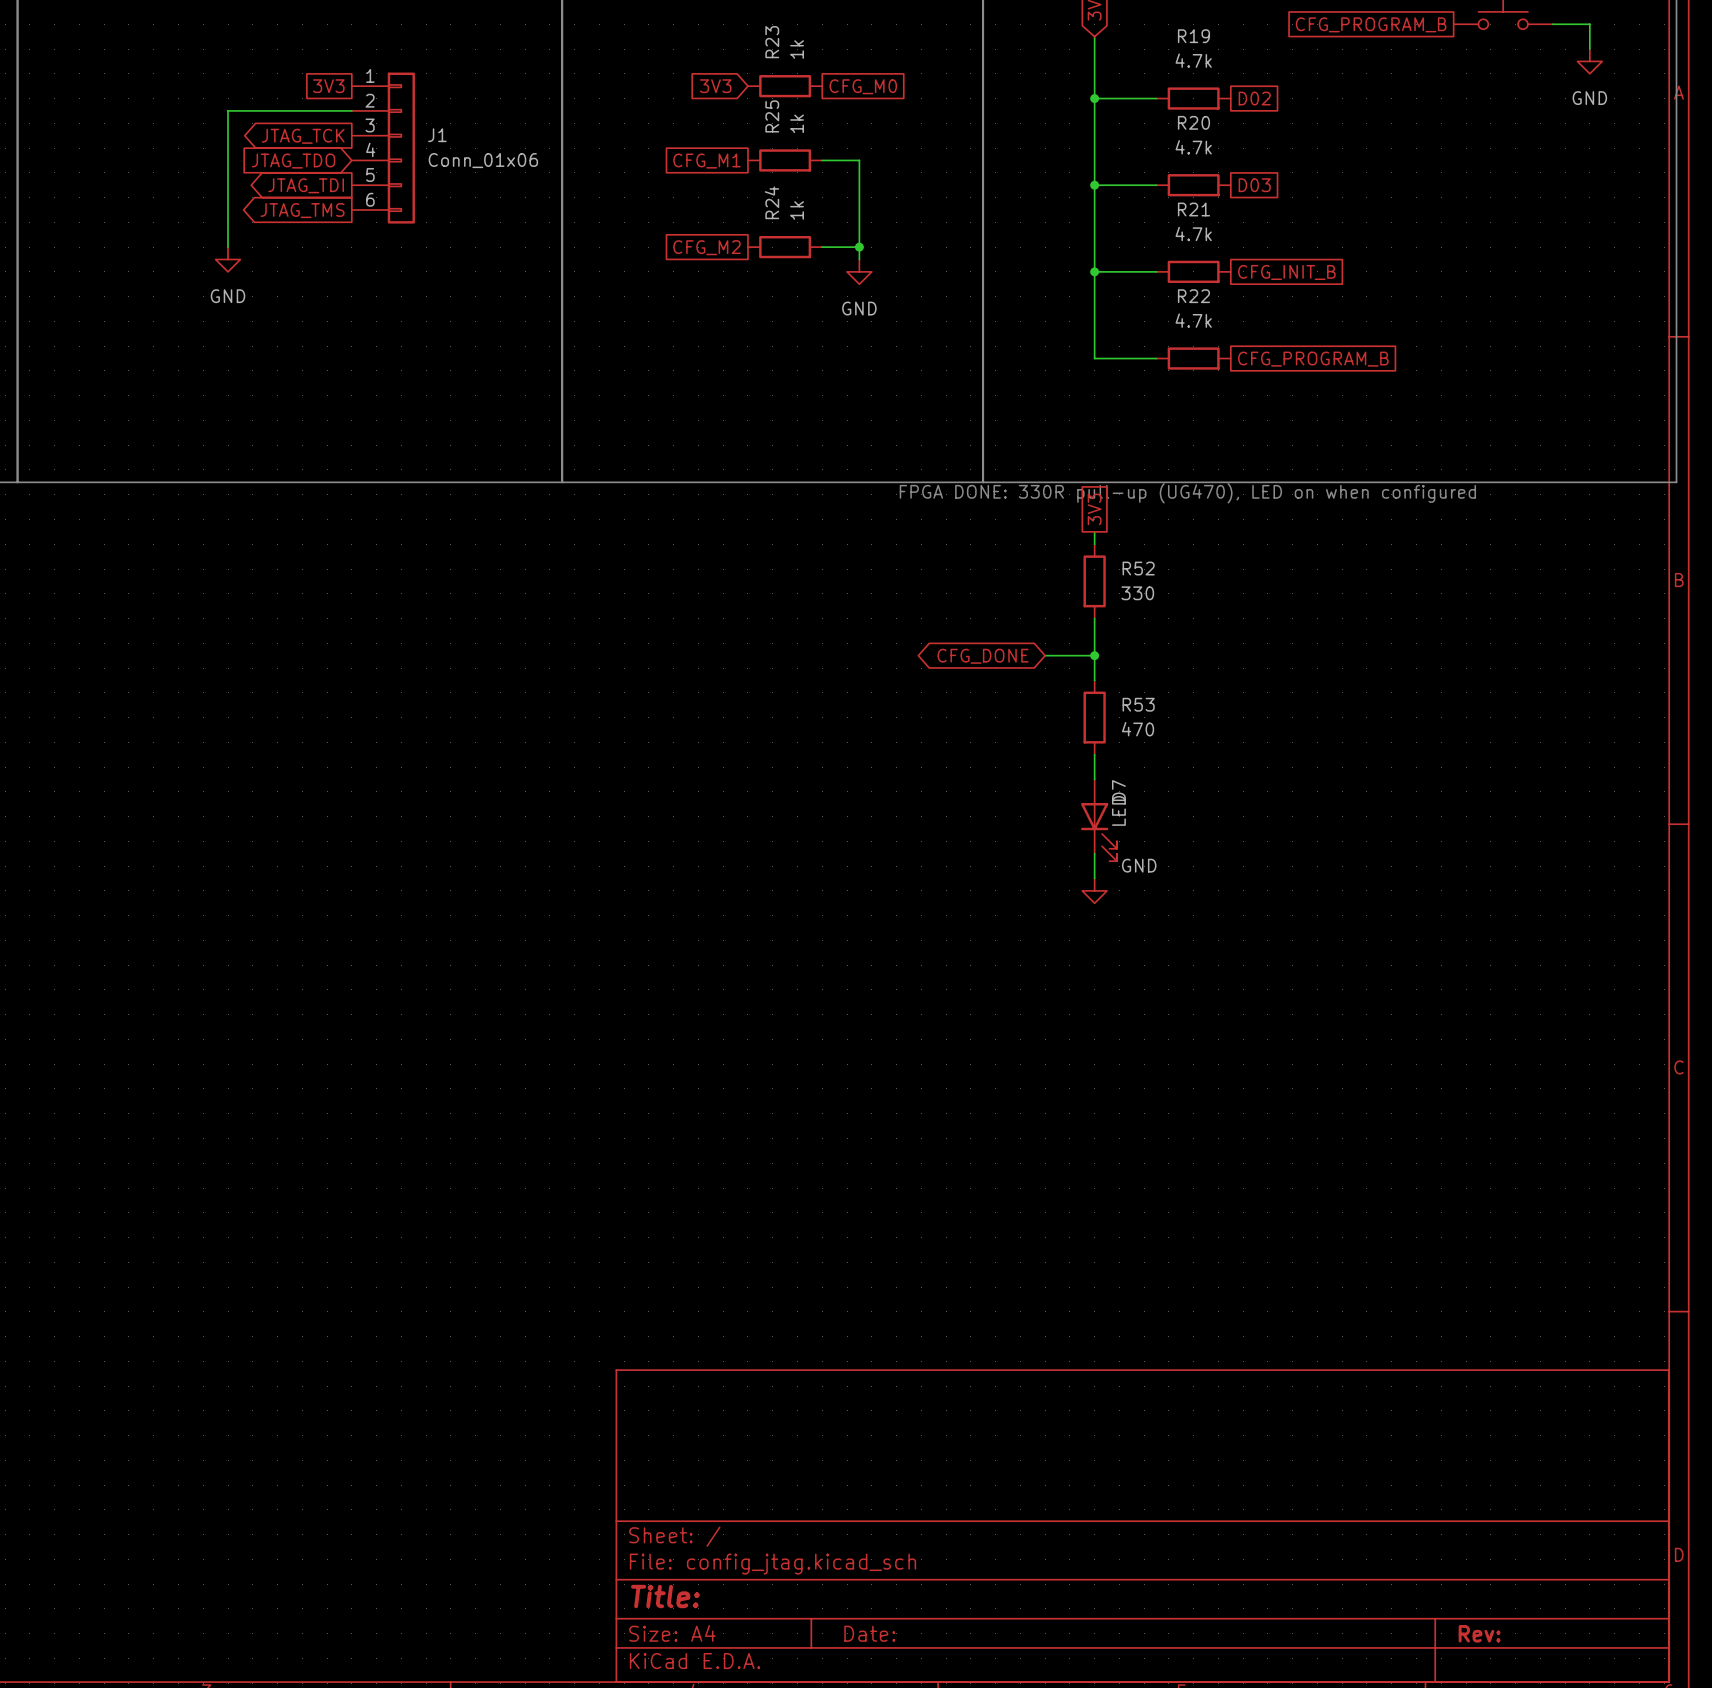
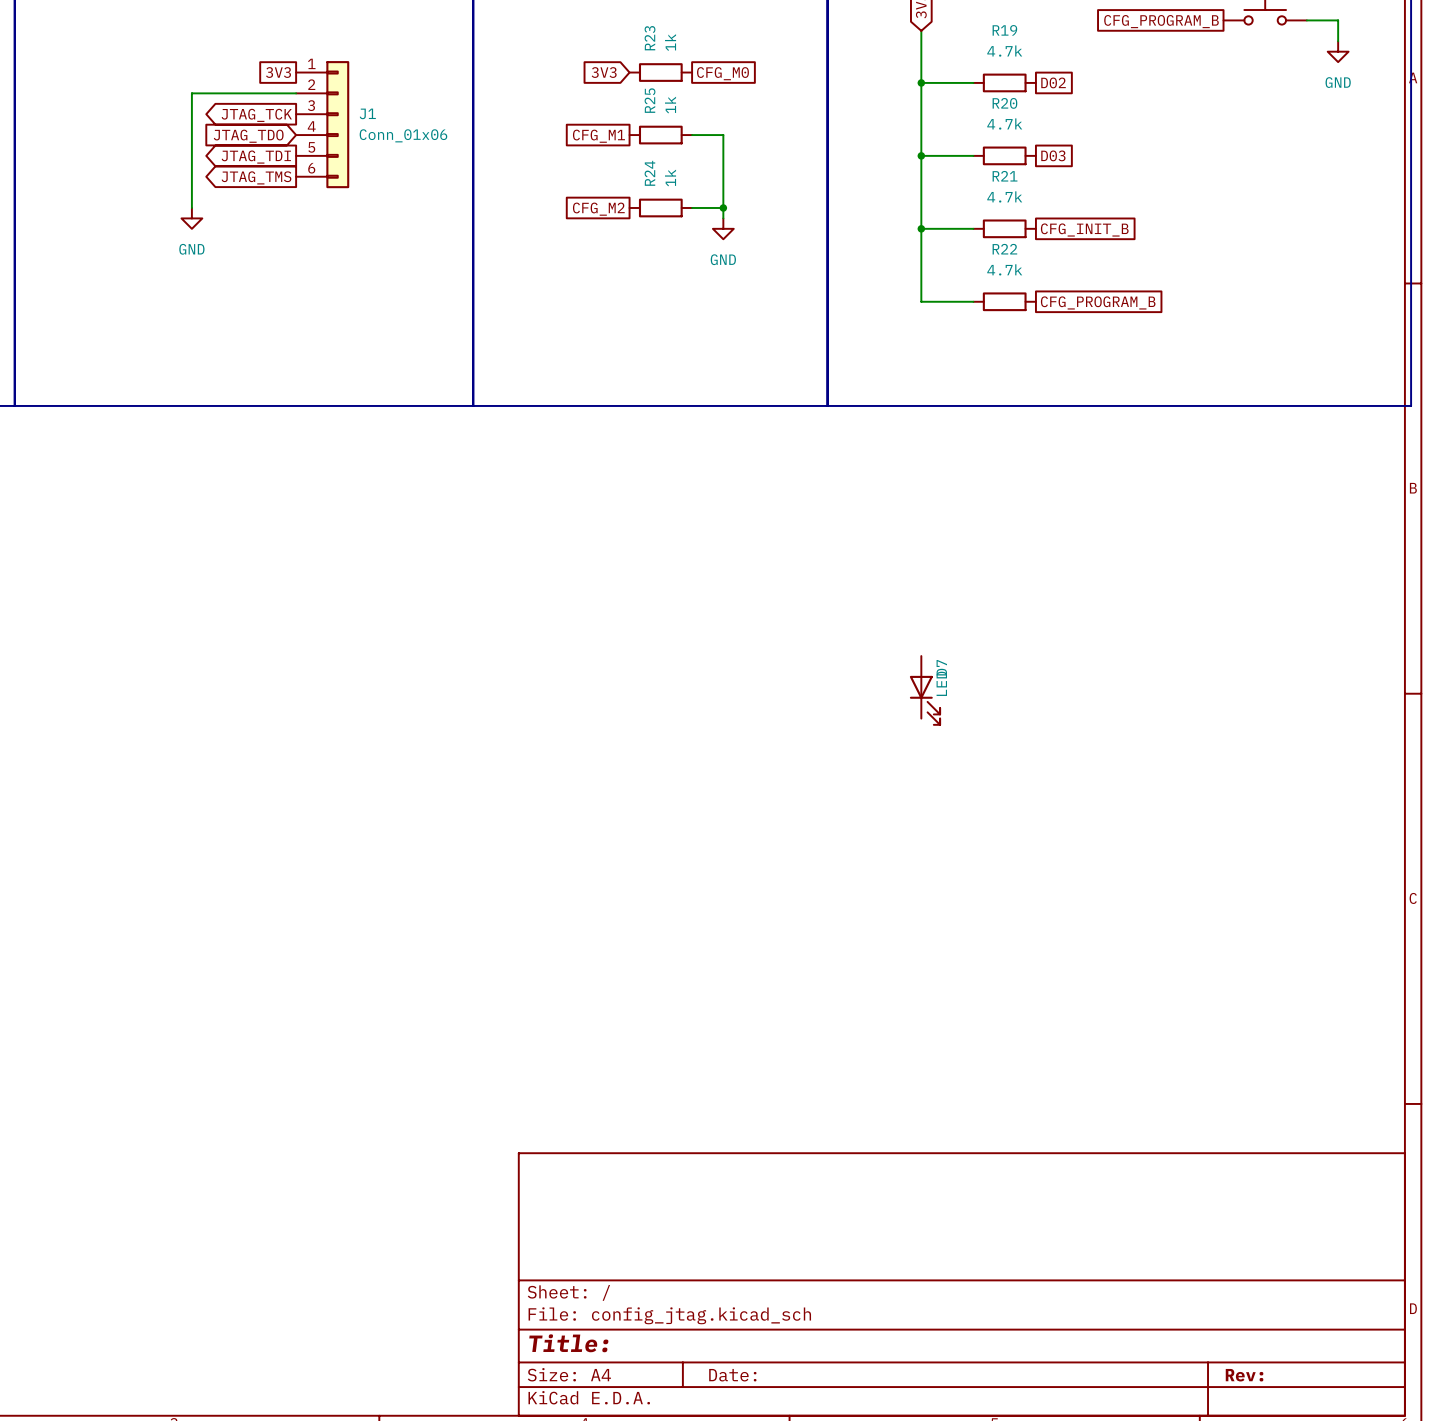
text: FPGA DONE: 330R pull-up (UG470), LED on when configured (1187, 493) -> none
global label: 3V3 (1094, 509) -> none
wire: (1094, 531) (1094, 544) -> none
R52: 330 (1094, 581) -> none
wire: (1094, 618) (1094, 680) -> none
wire: (1045, 655) (1094, 655) -> none
junction: (1094, 655) -> none
global label: CFG_DONE (983, 656) -> none
R53: 470 (1094, 717) -> none
wire: (1094, 754) (1094, 779) -> none
wire: (1094, 853) (1094, 878) -> none
power symbol: GND (1094, 890) -> none

